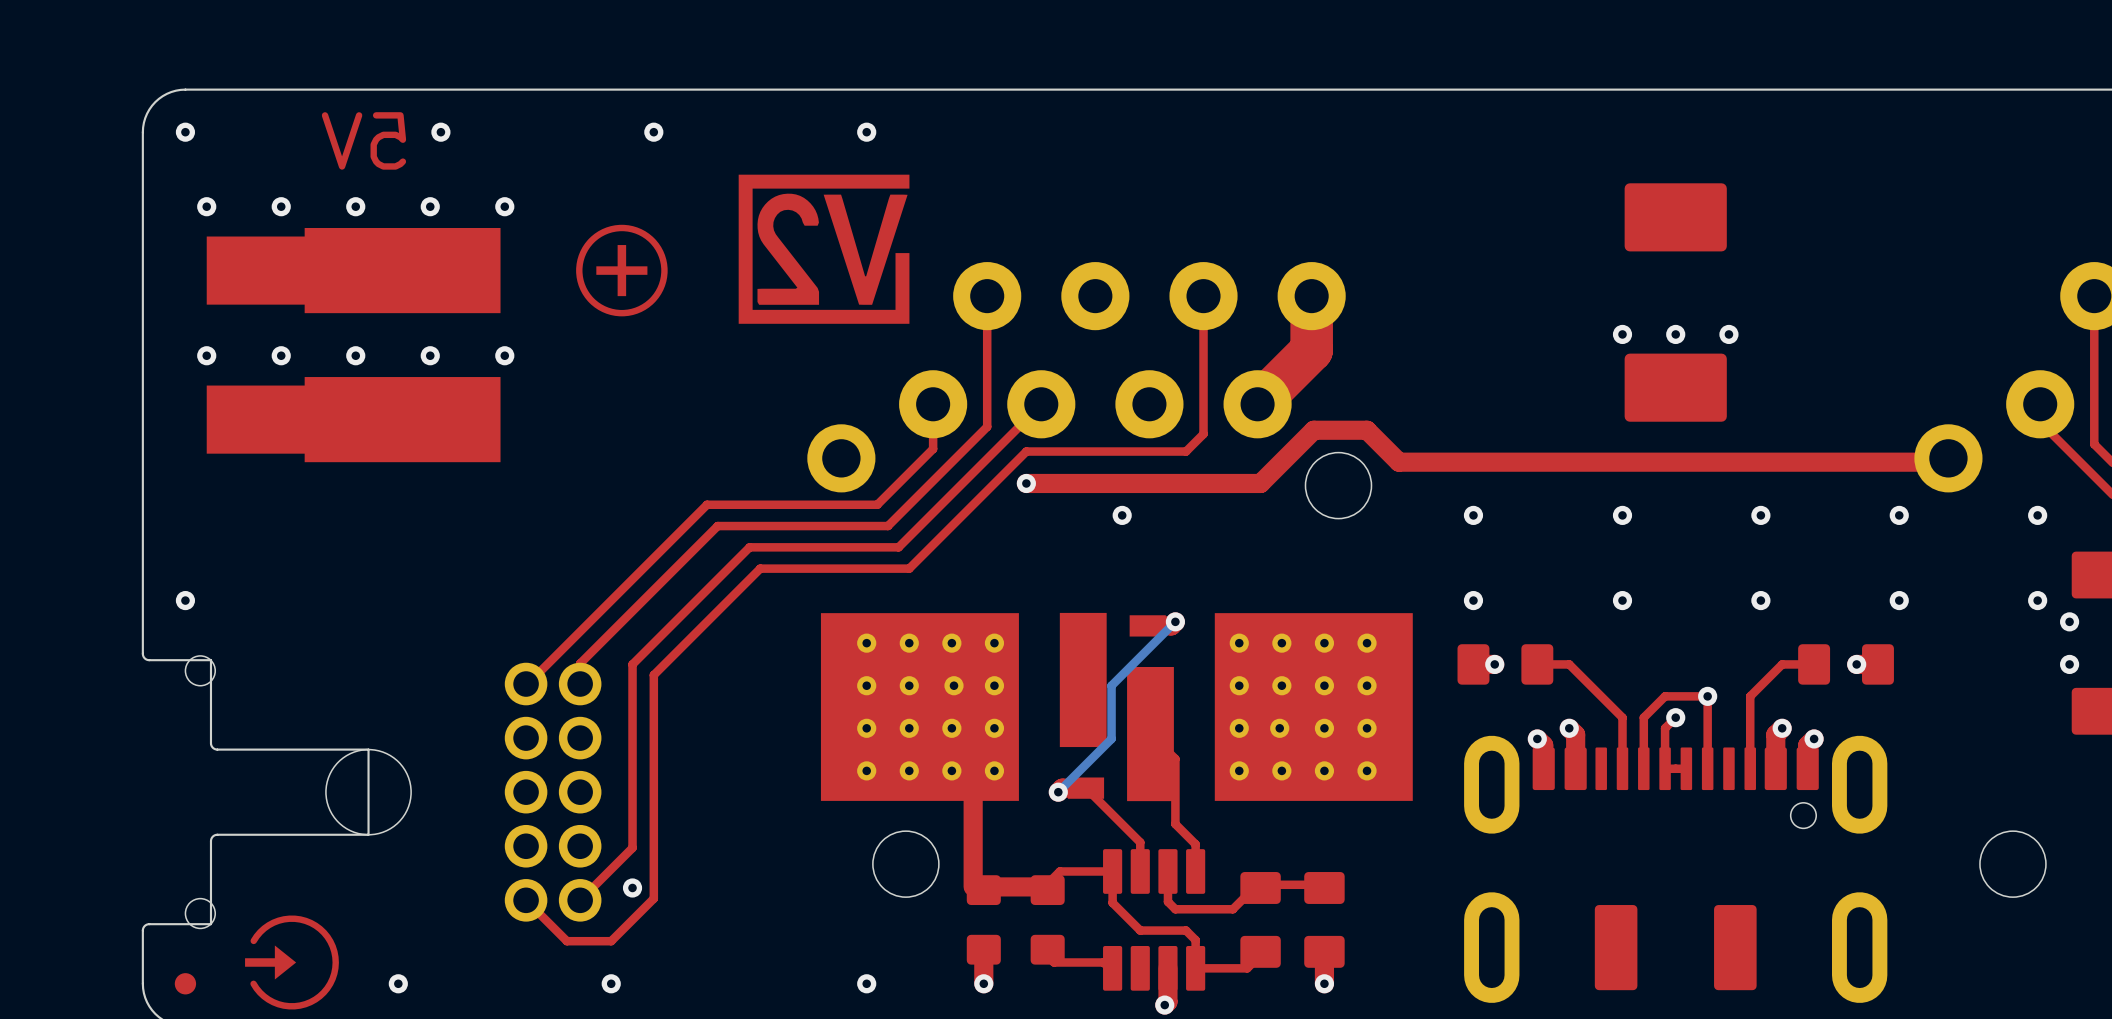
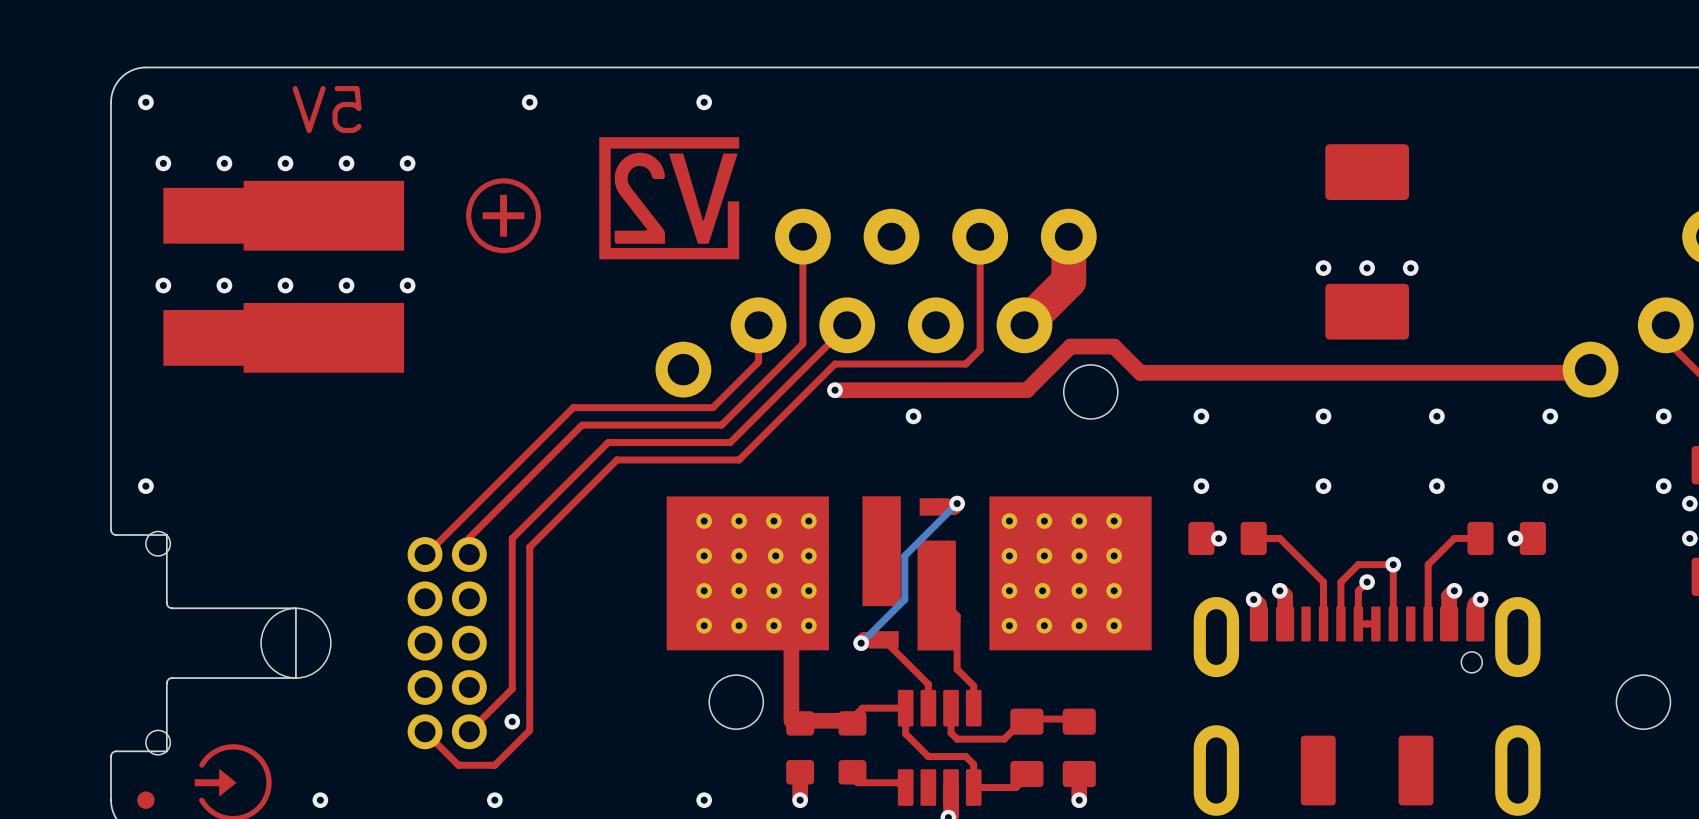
via: (440, 132) -> none
drawing position: (363, 140) -> (327, 109)

